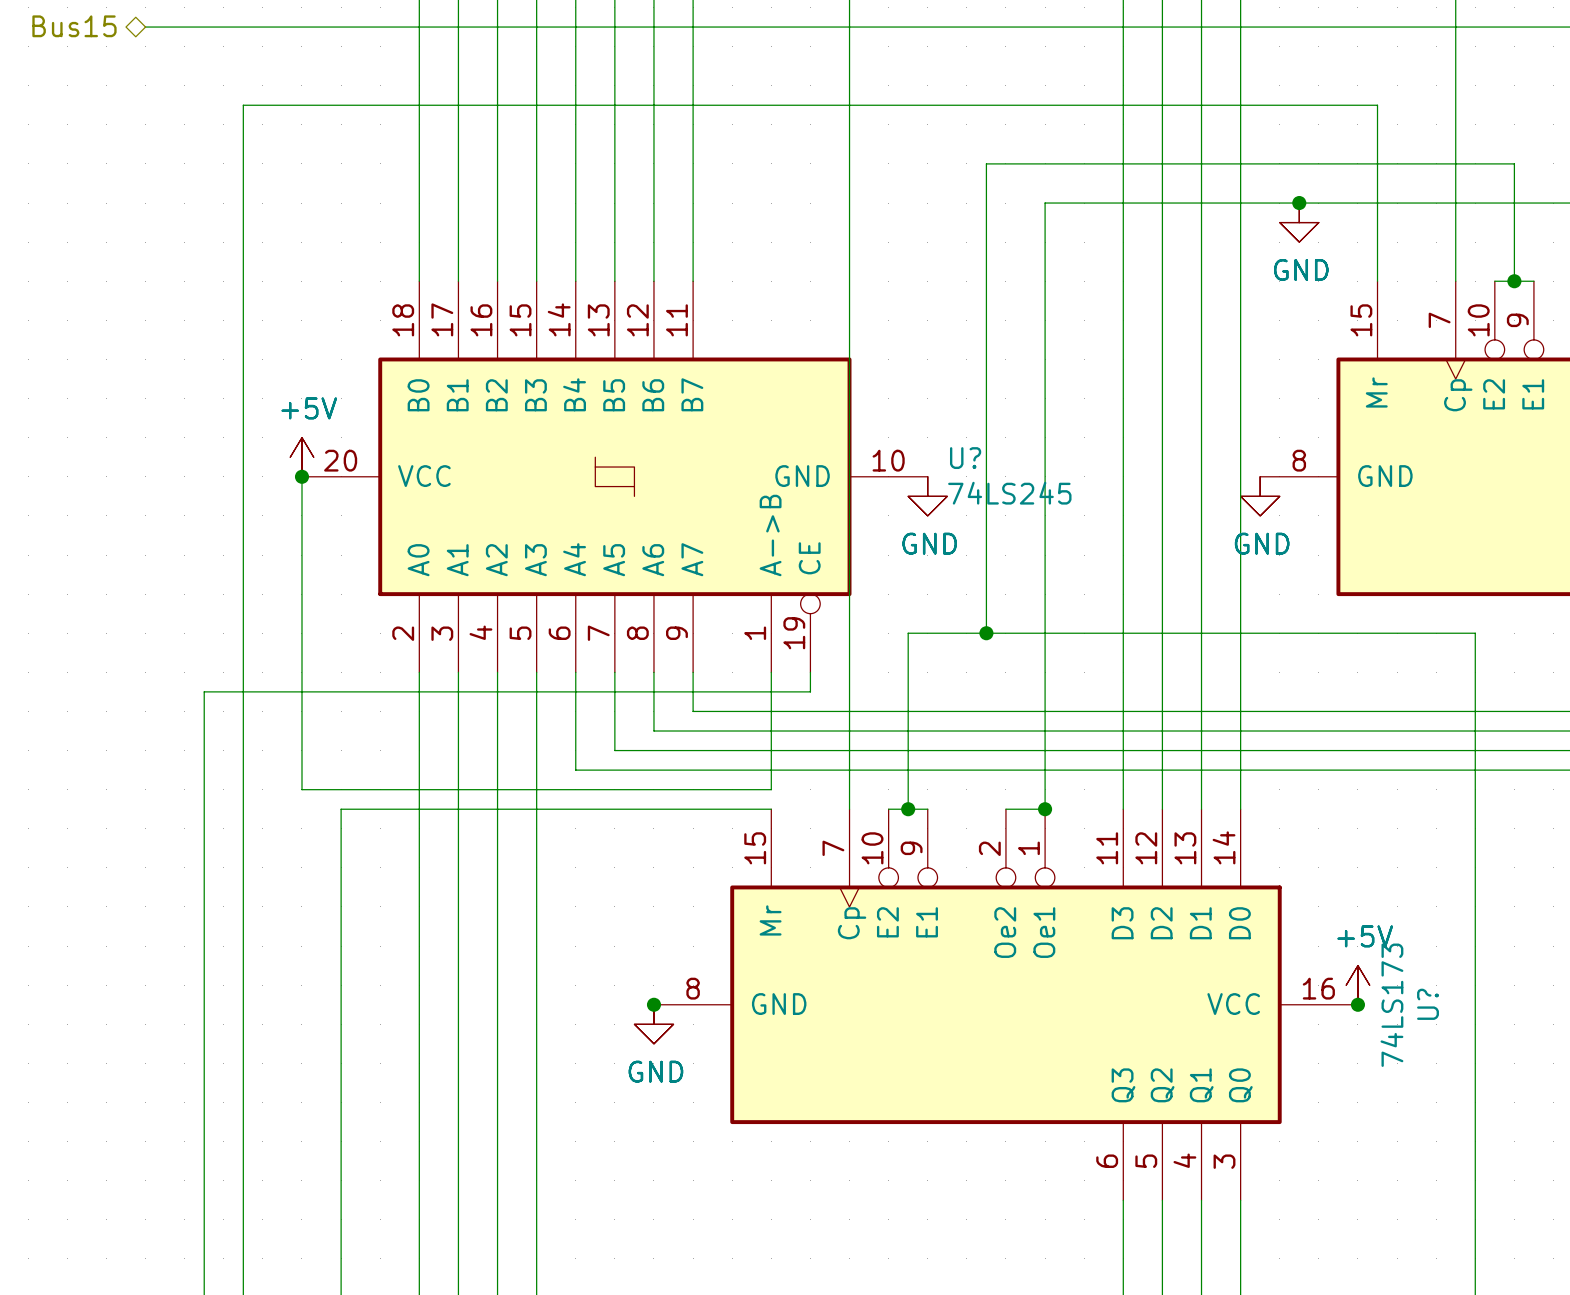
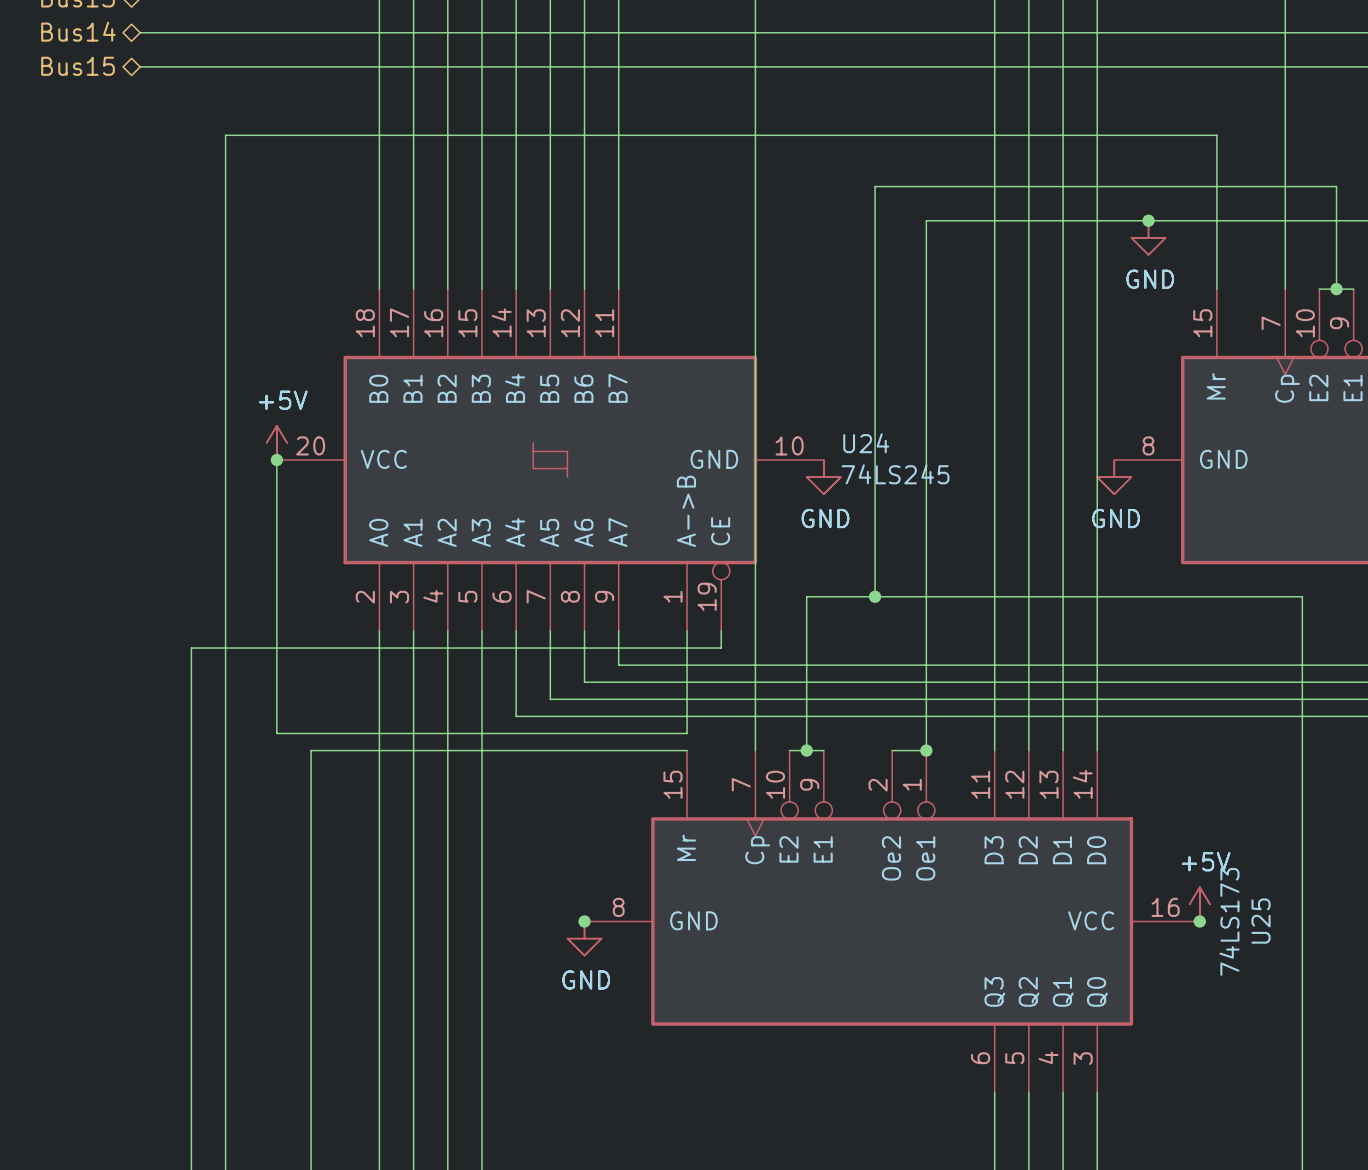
U? name: U? (965, 458) -> U24 (866, 443)
U? name: U? (1428, 1004) -> U25 (1261, 921)

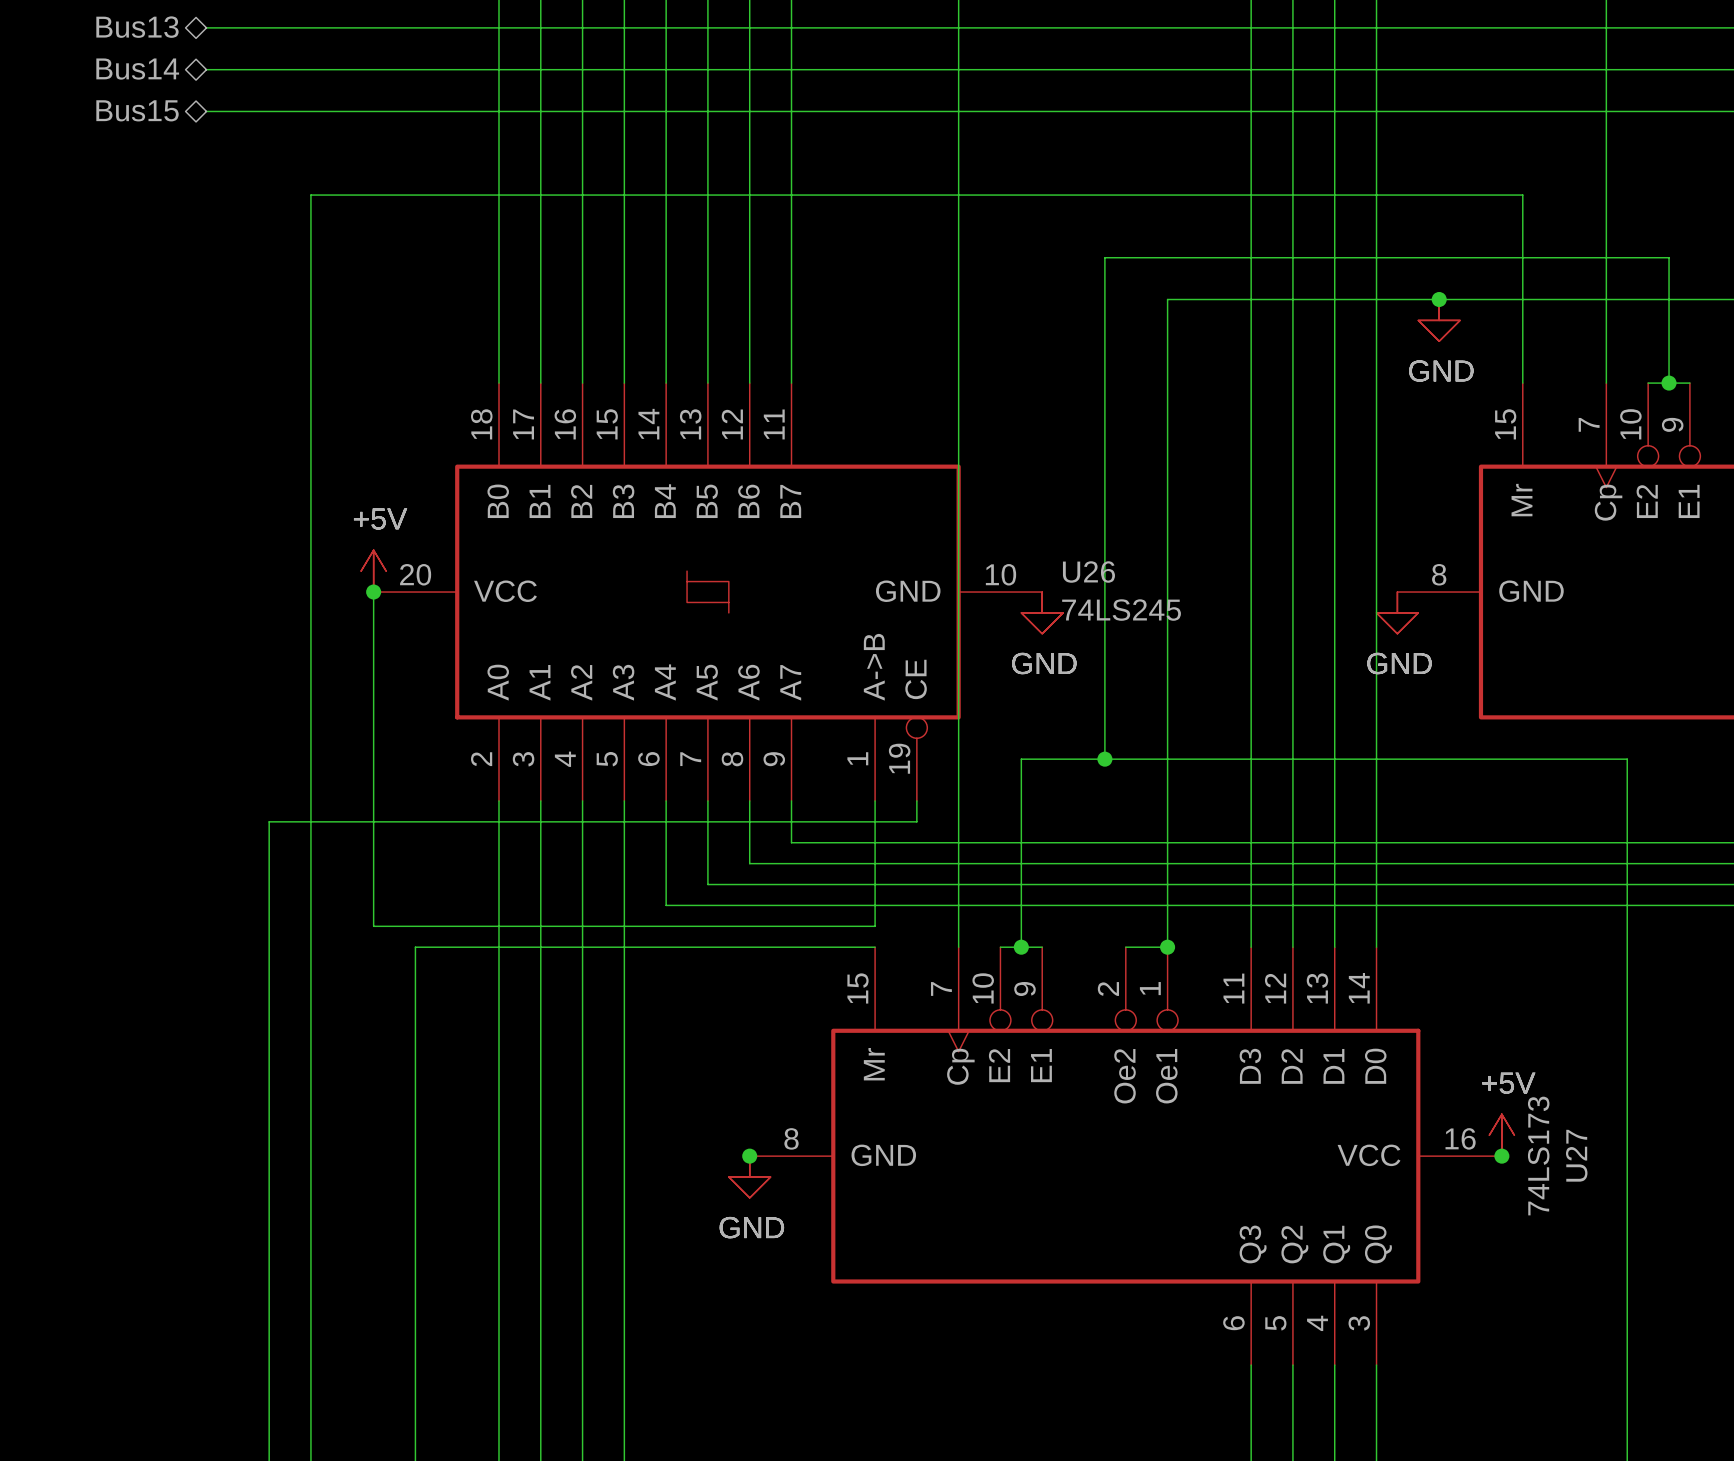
U24 name: U24 (866, 443) -> U26 (1088, 572)
U25 name: U25 (1261, 921) -> U27 (1576, 1155)

